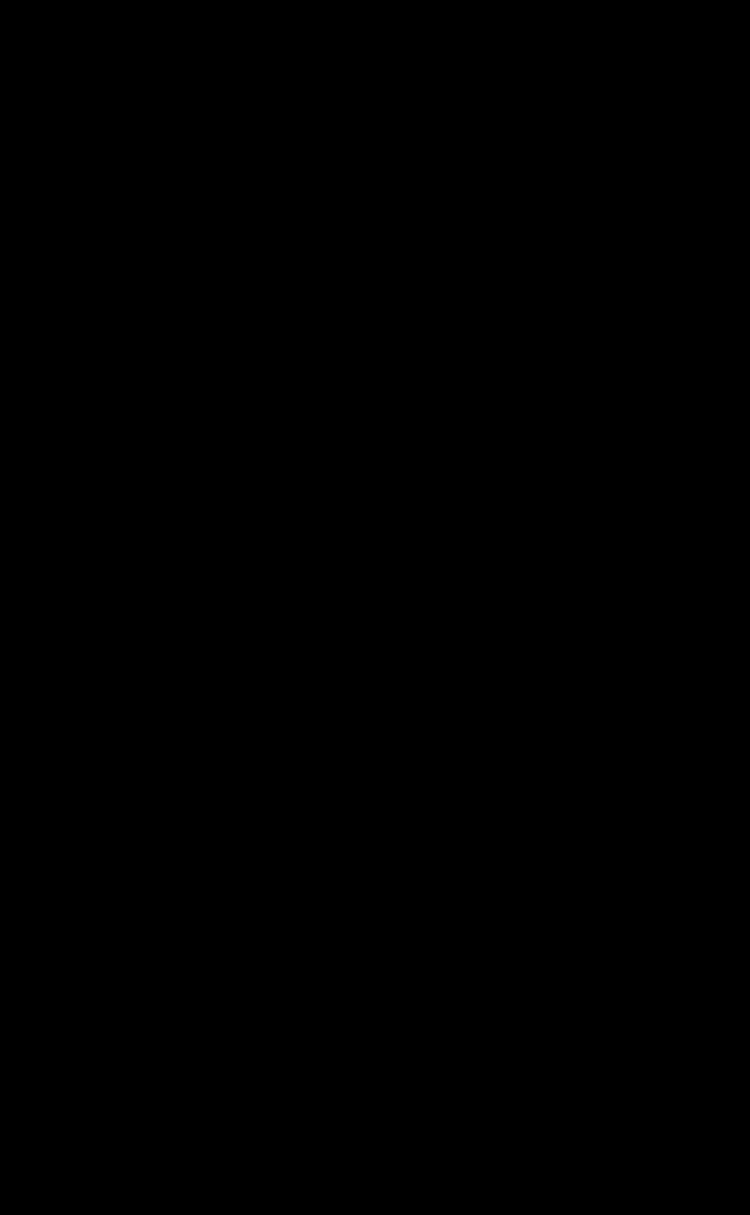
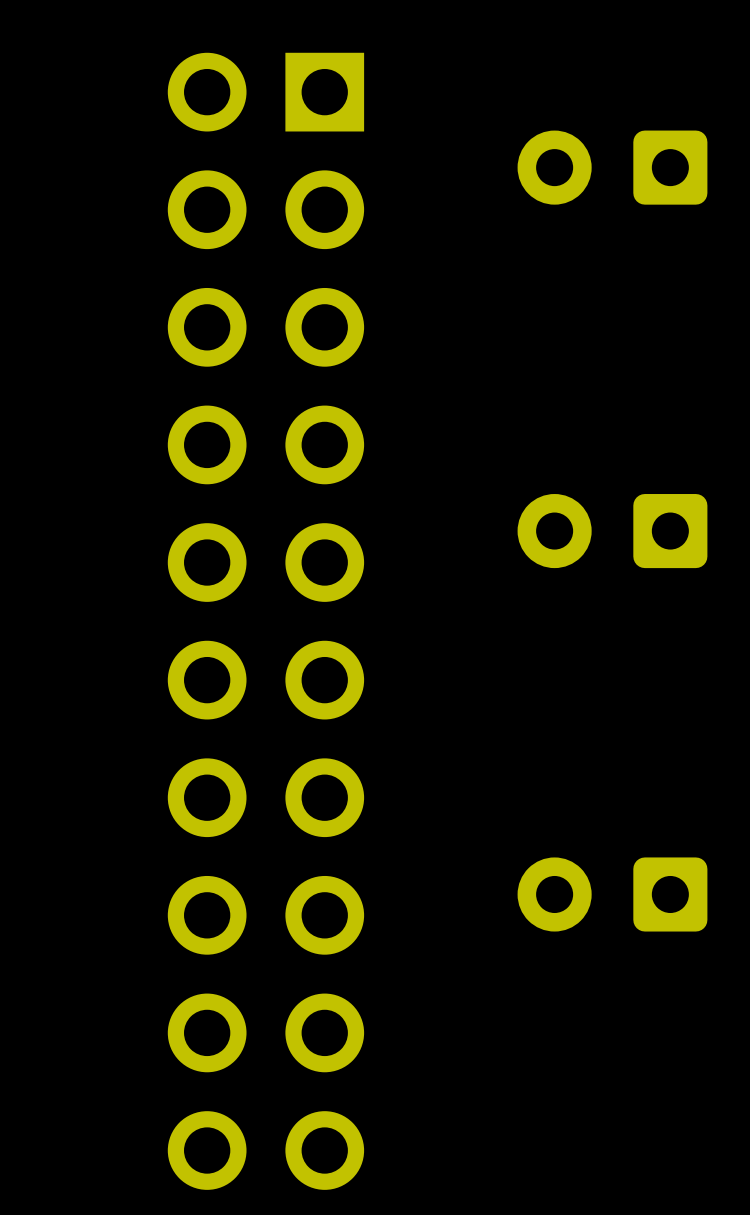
part: none -> (612, 167)
part: none -> (612, 531)
part: none -> (265, 621)
part: none -> (612, 894)

